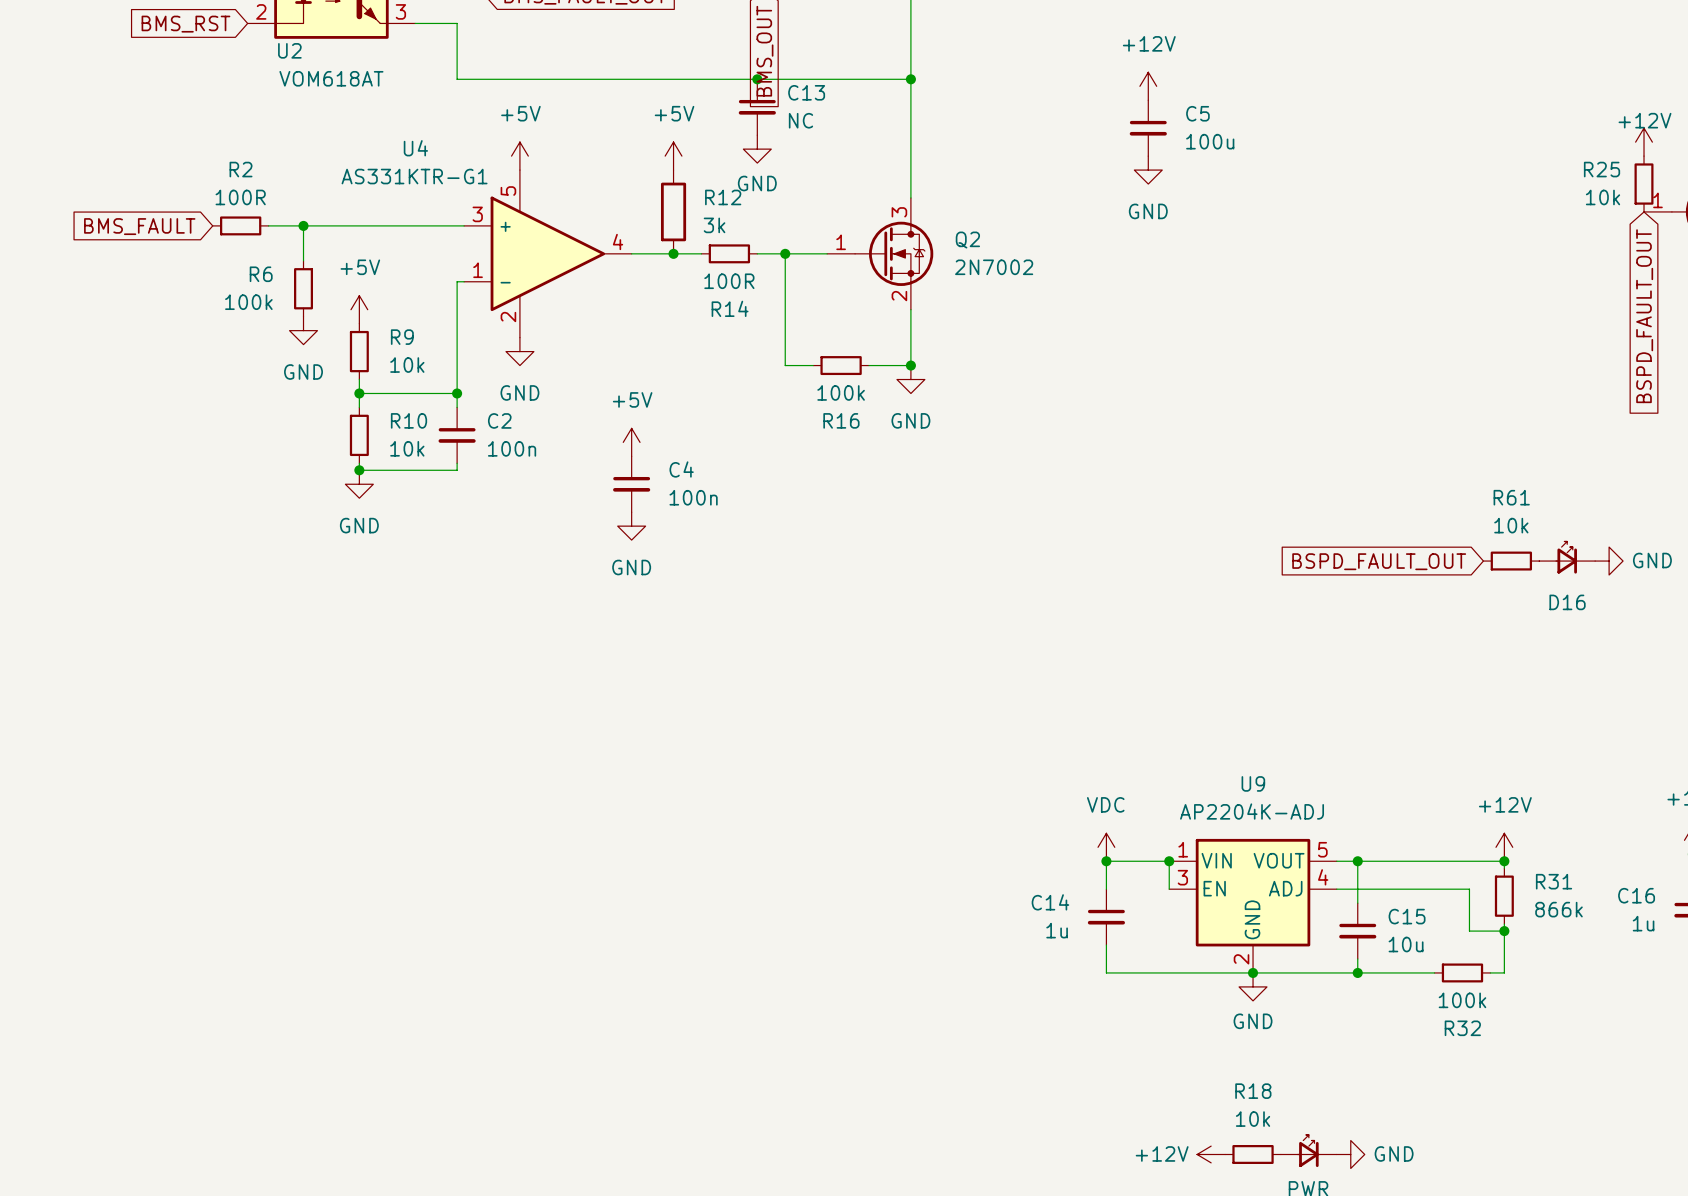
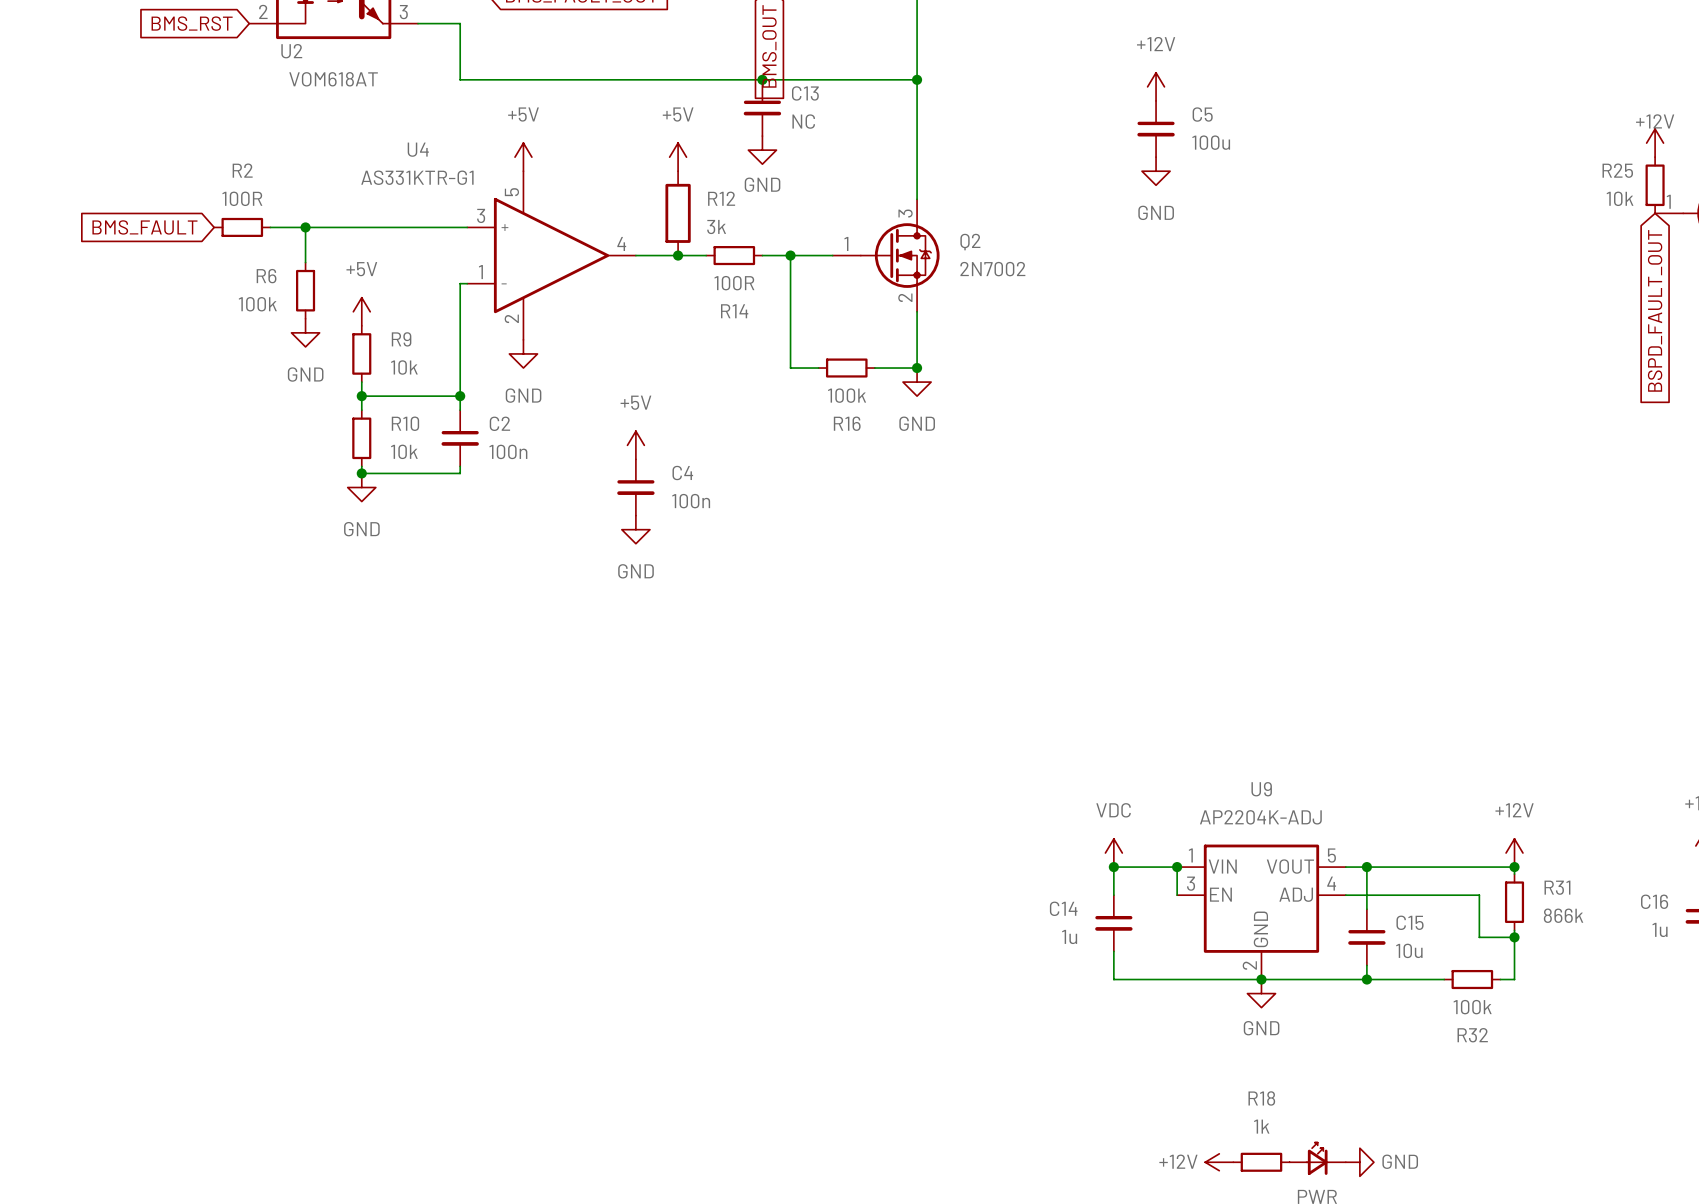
D16: (1567, 557) -> none
global label: BSPD_FAULT_OUT (1379, 561) -> none
R61: 10k (1511, 561) -> none
power symbol: GND (1609, 561) -> none
R18 value: 10k (1253, 1119) -> 1k (1261, 1126)

